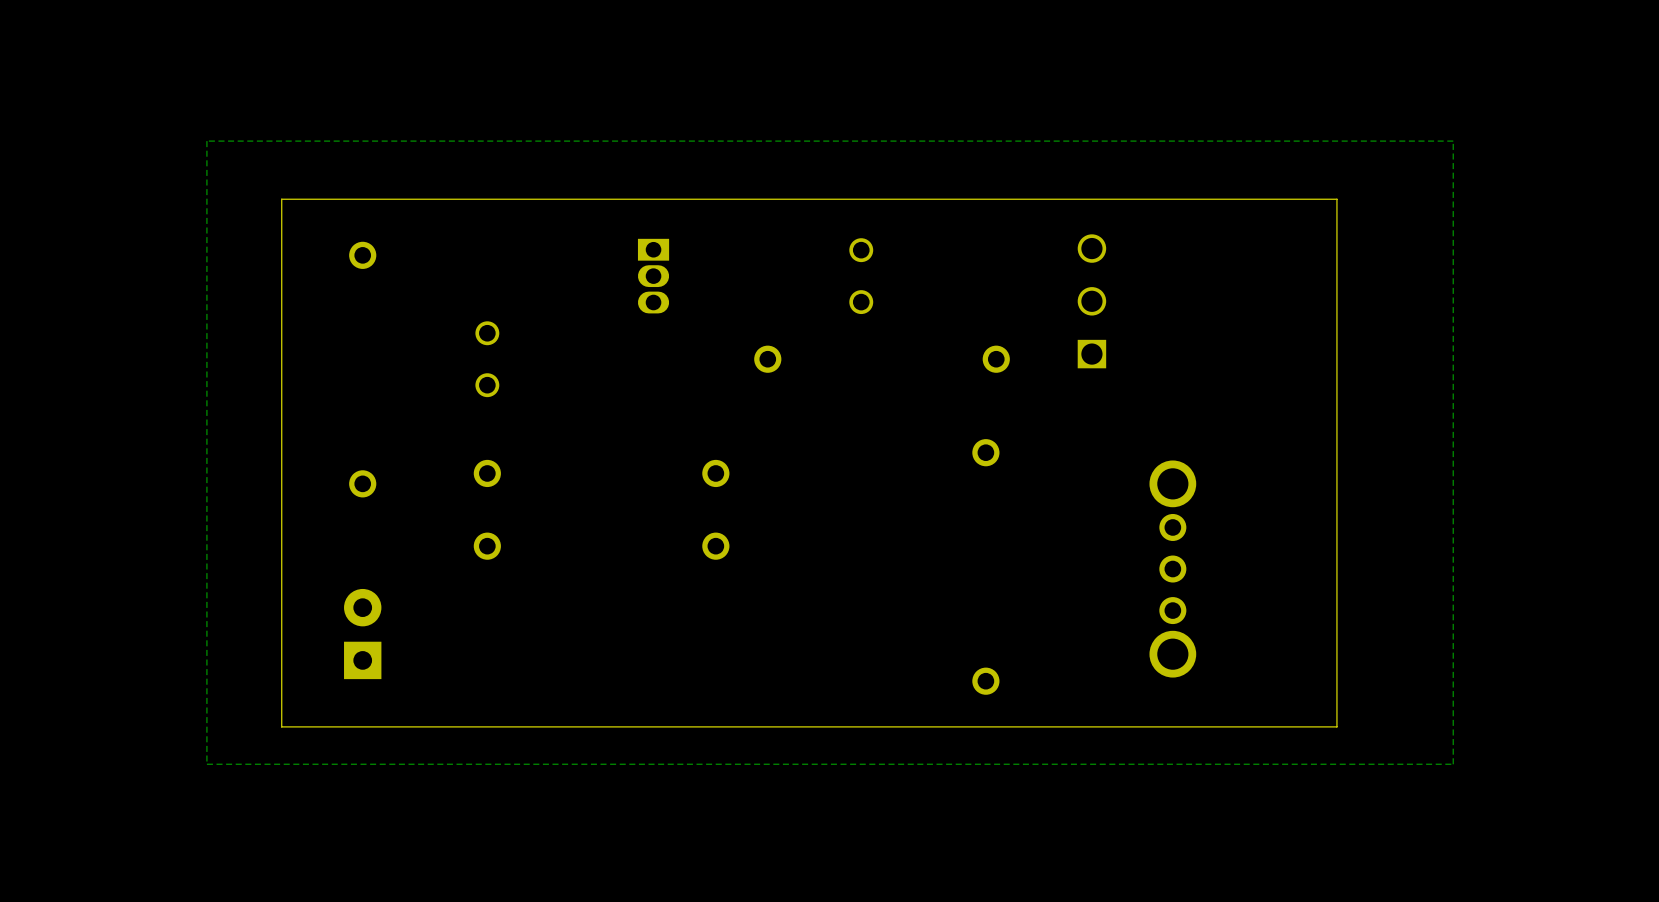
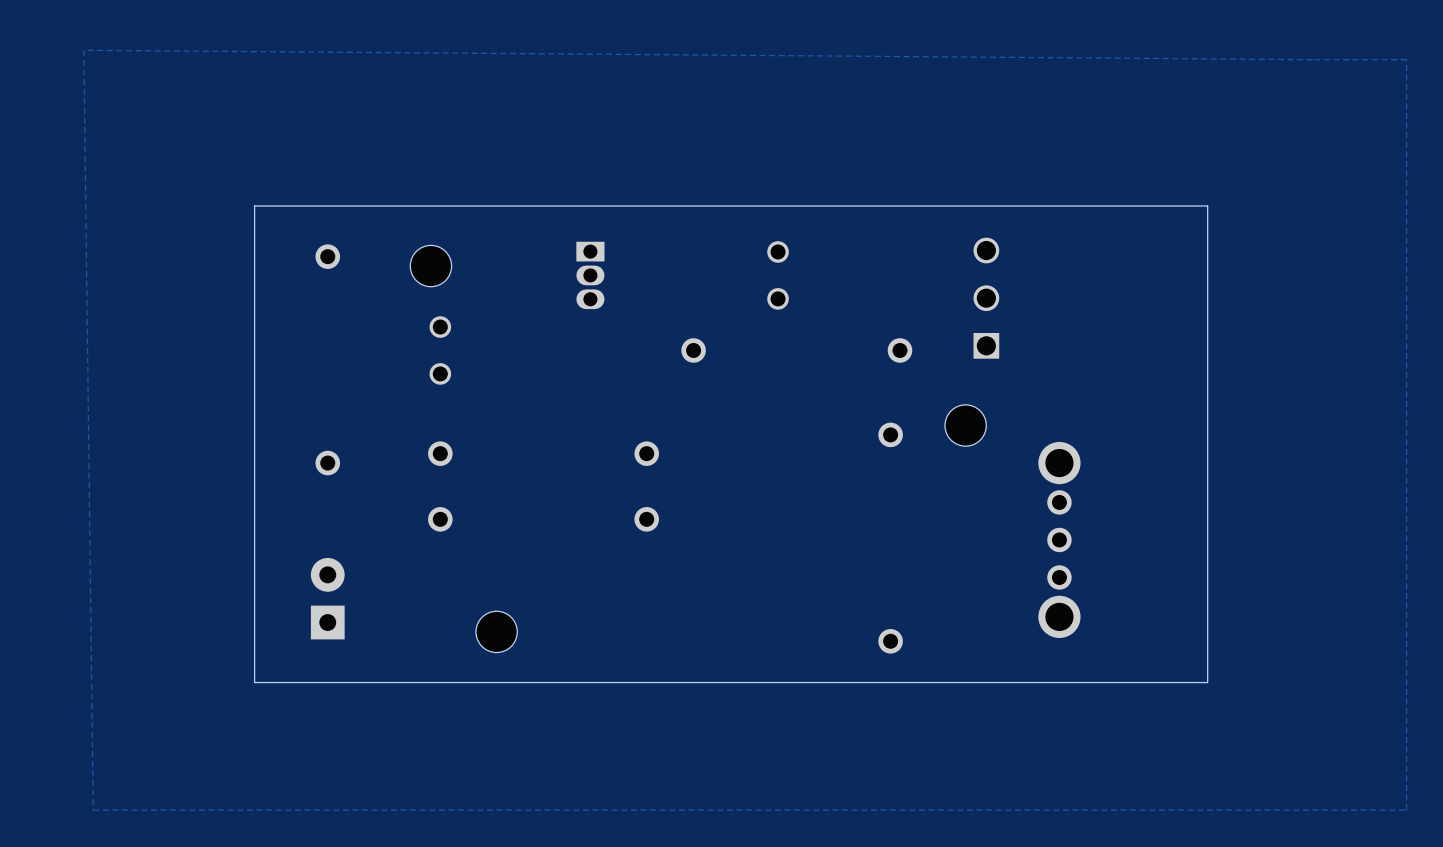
zone outline: (1453, 141) (206, 141) (206, 764) (1453, 764) (1453, 141) -> (83, 50) (1406, 59) (1406, 810) (93, 810) (83, 50)
part: none -> (430, 266)
part: none -> (965, 425)
part: none -> (496, 631)

